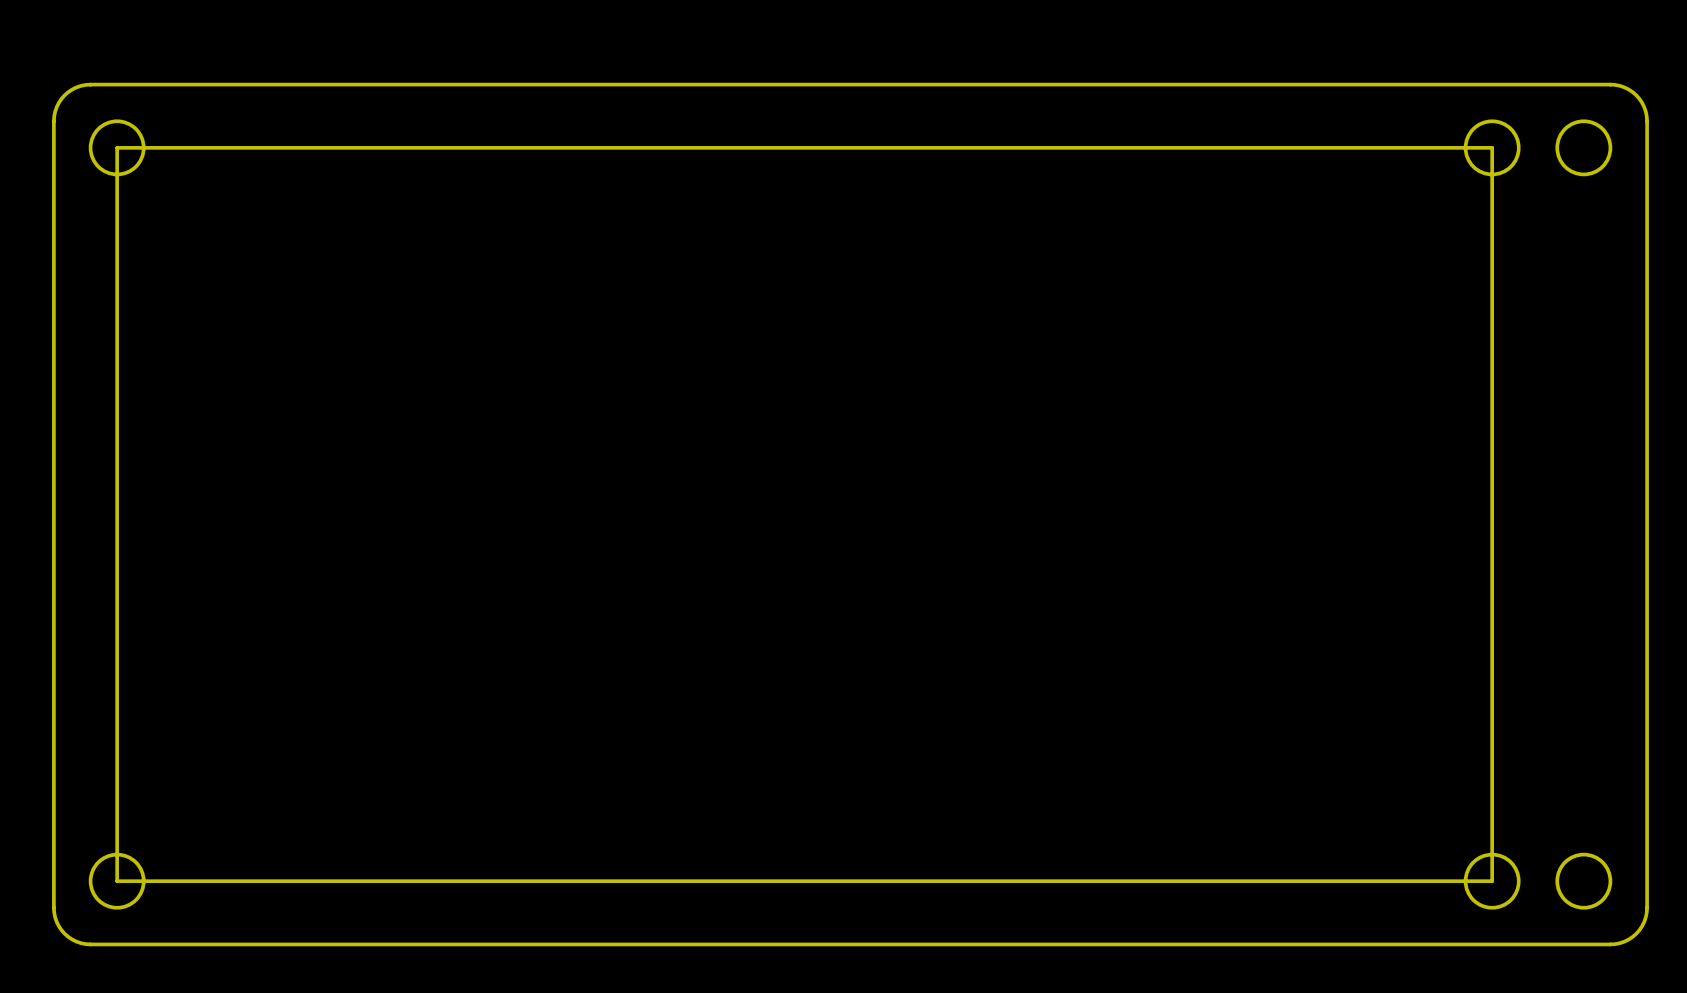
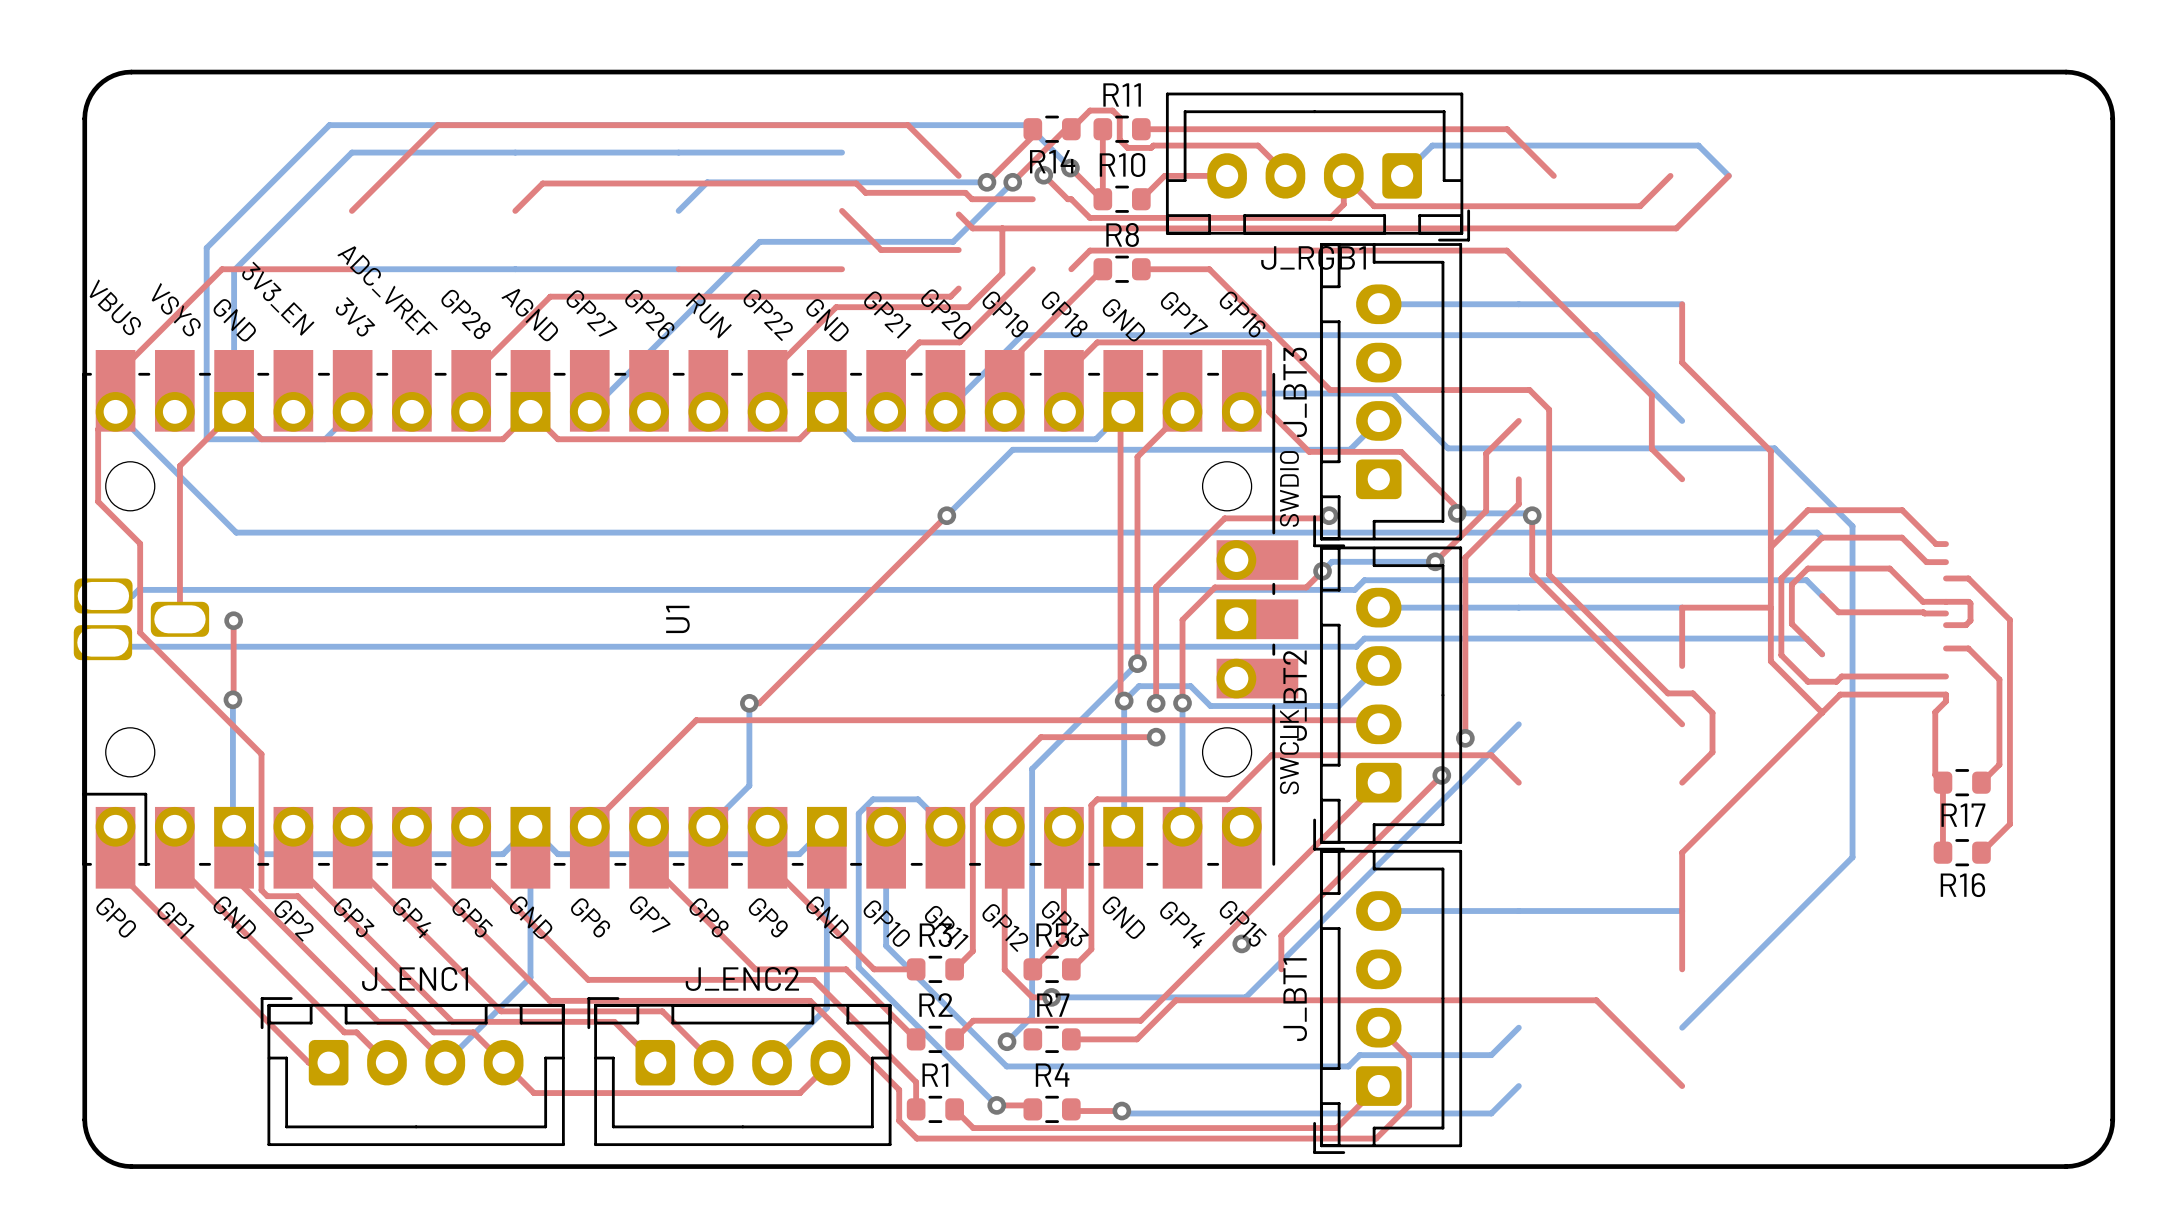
round board edge: [88, 119, 146, 177] -> none
round board edge: [1463, 119, 1521, 177] -> none
round board edge: [1555, 119, 1613, 177] -> none
top track: none -> (1032, 129) (1032, 136) (986, 182)
R14: none -> (1052, 129)
top track: none -> (1102, 129) (1102, 199) (1070, 168)
R11: none -> (1122, 129)
top track: none -> (1141, 129) (1507, 129) (1553, 175)
board edge: (117, 147) (117, 881) (1492, 881) (1492, 147) (117, 147) -> none
bottom track: none -> (842, 152) (351, 152) (234, 270) (234, 411)
J_RGB1: none -> (1317, 167)
bottom track: none -> (1070, 168) (1027, 125) (329, 125) (206, 247) (206, 437) (325, 439) (352, 411)
via: none -> (1070, 168)
top track: none -> (1043, 175) (1089, 217) (1330, 217) (1343, 204) (1343, 175) (1374, 206) (1640, 206) (1670, 175)
via: none -> (1043, 175)
top track: none -> (958, 175) (907, 125) (437, 125) (351, 210)
top track: none -> (1227, 175) (1164, 175) (1141, 199)
top track: none -> (1285, 175) (1285, 172) (1258, 145) (1153, 145) (1151, 147) (1127, 147) (1119, 139) (1119, 117) (1112, 110) (1089, 110) (1071, 129) (1065, 129) (1012, 182)
bottom track: none -> (1402, 175) (1432, 145) (1698, 145) (1728, 175)
top track: none -> (1728, 175) (1676, 228) (972, 228) (958, 214)
bottom track: none -> (986, 182) (707, 182) (678, 210)
via: none -> (986, 182)
bottom track: none -> (1012, 182) (953, 241) (759, 241) (589, 411)
via: none -> (1012, 182)
top track: none -> (1032, 199) (971, 199) (965, 192) (865, 192) (856, 183) (542, 183) (515, 210)
R10: none -> (1122, 199)
top track: none -> (842, 210) (881, 250) (958, 250)
top track: none -> (1002, 228) (1002, 273) (968, 307) (836, 307) (767, 375) (767, 411)
top track: none -> (351, 269) (222, 269) (115, 375) (115, 411) (98, 429) (98, 501) (140, 543) (140, 632) (261, 754) (261, 890) (267, 896) (297, 896) (433, 1032) (473, 1032) (533, 1093) (800, 1093) (830, 1062)
bottom track: none -> (351, 269) (678, 269)
top track: none -> (678, 269) (842, 269)
top track: none -> (1032, 269) (959, 342) (919, 342) (886, 375) (886, 411)
top track: none -> (1071, 269) (1089, 250) (1506, 250) (1651, 395) (1651, 448) (1682, 479)
top track: none -> (1102, 269) (1004, 367) (1004, 411)
R8: none -> (1122, 269)
top track: none -> (1141, 269) (1209, 269) (1330, 390) (1529, 390) (1549, 409) (1549, 574) (1667, 693) (1692, 693) (1712, 712) (1712, 752) (1682, 782)
top track: none -> (958, 288) (950, 296) (550, 296) (471, 375) (471, 411)
bottom track: none -> (1378, 304) (1682, 304)
top track: none -> (1682, 304) (1682, 362) (1770, 451) (1770, 661) (1822, 712)
J_BT3: none -> (1387, 395)
bottom track: none -> (115, 411) (236, 532) (1817, 532) (1822, 537)
top track: none -> (826, 411) (799, 439) (557, 439) (530, 411) (503, 439) (261, 439) (234, 411) (179, 465) (179, 619)
bottom track: none -> (826, 411) (854, 439) (1095, 439) (1123, 411)
bottom track: none -> (945, 411) (1022, 335) (1596, 335) (1682, 420)
top track: none -> (1063, 411) (1063, 375) (1097, 342) (1267, 342) (1269, 411) (1309, 451) (1401, 451) (1457, 507) (1457, 513)
top track: none -> (1123, 411) (1120, 414) (1120, 697) (1124, 700)
top track: none -> (1182, 411) (1137, 456) (1137, 663)
bottom track: none -> (1241, 411) (1260, 393) (1393, 393) (1447, 448) (1774, 448) (1852, 526) (1852, 857) (1682, 1027)
bottom track: none -> (1378, 420) (1349, 449) (1012, 449) (946, 515)
top track: none -> (1518, 420) (1486, 453) (1486, 511) (1435, 561)
top track: none -> (1518, 479) (1518, 504) (1465, 557) (1465, 738)
bottom track: none -> (1457, 513) (1529, 513) (1532, 515)
via: none -> (1457, 513)
top track: none -> (946, 515) (759, 703) (749, 703)
via: none -> (946, 515)
top track: none -> (1329, 515) (1326, 518) (1224, 518) (1156, 586) (1156, 703)
via: none -> (1329, 515)
top track: none -> (1532, 515) (1532, 574) (1682, 724)
via: none -> (1532, 515)
top track: none -> (1946, 544) (1936, 544) (1902, 510) (1807, 510) (1770, 547)
bottom track: none -> (1435, 561) (1331, 561) (1322, 571)
via: none -> (1435, 561)
top track: none -> (1946, 562) (1926, 562) (1902, 537) (1822, 537) (1781, 578) (1781, 655) (1807, 681) (1836, 681) (1841, 676) (1946, 676)
top track: none -> (1322, 571) (1306, 587) (1214, 587) (1182, 619) (1182, 703)
via: none -> (1322, 571)
top track: none -> (1946, 578) (1968, 578) (2009, 620) (2009, 824) (1981, 852)
bottom track: none -> (103, 595) (132, 595) (138, 589) (1354, 589) (1364, 580) (1806, 580) (1822, 595)
top track: none -> (1822, 595) (1838, 612) (1946, 613)
bottom track: none -> (1378, 607) (1682, 607)
top track: none -> (1770, 607) (1682, 607) (1682, 665)
U1: none -> (686, 619)
top track: none -> (233, 620) (232, 699)
via: none -> (233, 620)
top track: none -> (1946, 625) (1965, 625) (1970, 620) (1970, 603) (1968, 601) (1923, 601) (1889, 568) (1807, 568) (1791, 584) (1791, 623) (1822, 654)
bottom track: none -> (102, 642) (107, 646) (1356, 646) (1364, 638) (1806, 638) (1822, 654)
top track: none -> (1946, 648) (1968, 648) (1999, 679) (1999, 764) (1981, 782)
bottom track: none -> (1137, 663) (1032, 769) (1032, 1016) (1007, 1041)
via: none -> (1137, 663)
bottom track: none -> (1378, 665) (1338, 706) (1210, 706) (1190, 686) (1139, 686) (1124, 700) (1123, 826)
J_BT2: none -> (1387, 698)
bottom track: none -> (232, 699) (232, 825) (261, 854) (503, 854) (530, 826)
via: none -> (232, 699)
via: none -> (1124, 700)
bottom track: none -> (749, 703) (749, 785) (708, 826)
via: none -> (749, 703)
via: none -> (1156, 703)
bottom track: none -> (1182, 703) (1182, 826)
via: none -> (1182, 703)
top track: none -> (1378, 724) (1374, 720) (696, 720) (589, 826)
bottom track: none -> (1518, 724) (1245, 997) (1051, 997)
top track: none -> (1156, 737) (1040, 737) (972, 805) (972, 951) (954, 969)
via: none -> (1156, 737)
via: none -> (1465, 738)
top track: none -> (1441, 775) (1281, 935) (1281, 969)
via: none -> (1441, 775)
top track: none -> (1378, 782) (1140, 1020) (973, 1020) (954, 1039)
top track: none -> (1518, 782) (1491, 755) (1271, 755) (1227, 799) (1097, 799) (1091, 805) (1091, 949) (1071, 969)
R17: none -> (1962, 782)
top track: none -> (115, 826) (115, 869) (308, 1062) (328, 1062)
top track: none -> (174, 826) (174, 862) (344, 1032) (356, 1032) (386, 1062)
top track: none -> (234, 826) (234, 877) (378, 1021) (404, 1021) (445, 1062)
top track: none -> (293, 826) (293, 862) (452, 1021) (614, 1021) (655, 1062)
top track: none -> (352, 826) (352, 862) (501, 1011) (662, 1011) (713, 1062)
top track: none -> (411, 826) (411, 862) (549, 1000) (810, 1000) (899, 1089) (899, 1120) (916, 1138) (1376, 1138) (1409, 1105) (1409, 1058) (1378, 1027)
top track: none -> (471, 826) (471, 862) (588, 979) (813, 979) (916, 1082) (916, 1109)
bottom track: none -> (530, 826) (530, 977) (445, 1062)
bottom track: none -> (530, 826) (557, 854) (799, 854) (826, 826) (826, 1007) (772, 1062)
top track: none -> (649, 826) (649, 862) (755, 969) (846, 969) (916, 1039)
top track: none -> (767, 826) (767, 862) (874, 969) (916, 969)
bottom track: none -> (886, 826) (886, 945) (1006, 1066) (1348, 1066) (1359, 1055) (1491, 1055) (1518, 1027)
bottom track: none -> (945, 826) (918, 799) (872, 799) (858, 813) (858, 967) (996, 1105)
top track: none -> (1004, 826) (1004, 969) (1032, 997) (1051, 997)
top track: none -> (1063, 826) (1063, 938) (1032, 969)
top track: none -> (1942, 852) (1942, 782) (1935, 774) (1935, 712) (1946, 701) (1946, 694) (1840, 694) (1682, 852) (1682, 969)
R16: none -> (1962, 852)
bottom track: none -> (1378, 911) (1682, 911)
via: none -> (1241, 943)
R3: none -> (935, 969)
R5: none -> (1052, 969)
via: none -> (1051, 997)
J_BT1: none -> (1387, 1001)
R2: none -> (935, 1039)
R7: none -> (1052, 1039)
top track: none -> (1071, 1039) (1136, 1039) (1176, 1000) (1596, 1000) (1682, 1086)
via: none -> (1007, 1041)
round board edge: [88, 852, 146, 910] -> none
round board edge: [1463, 852, 1521, 910] -> none
round board edge: [1555, 852, 1613, 910] -> none
J_ENC1: none -> (412, 1071)
J_ENC2: none -> (739, 1071)
top track: none -> (1378, 1086) (1336, 1128) (973, 1128) (954, 1109)
bottom track: none -> (1518, 1086) (1491, 1113) (1124, 1113) (1121, 1111)
top track: none -> (996, 1105) (1028, 1105) (1032, 1109)
via: none -> (996, 1105)
R1: none -> (935, 1109)
R4: none -> (1052, 1109)
top track: none -> (1071, 1109) (1072, 1111) (1121, 1111)
via: none -> (1121, 1111)

